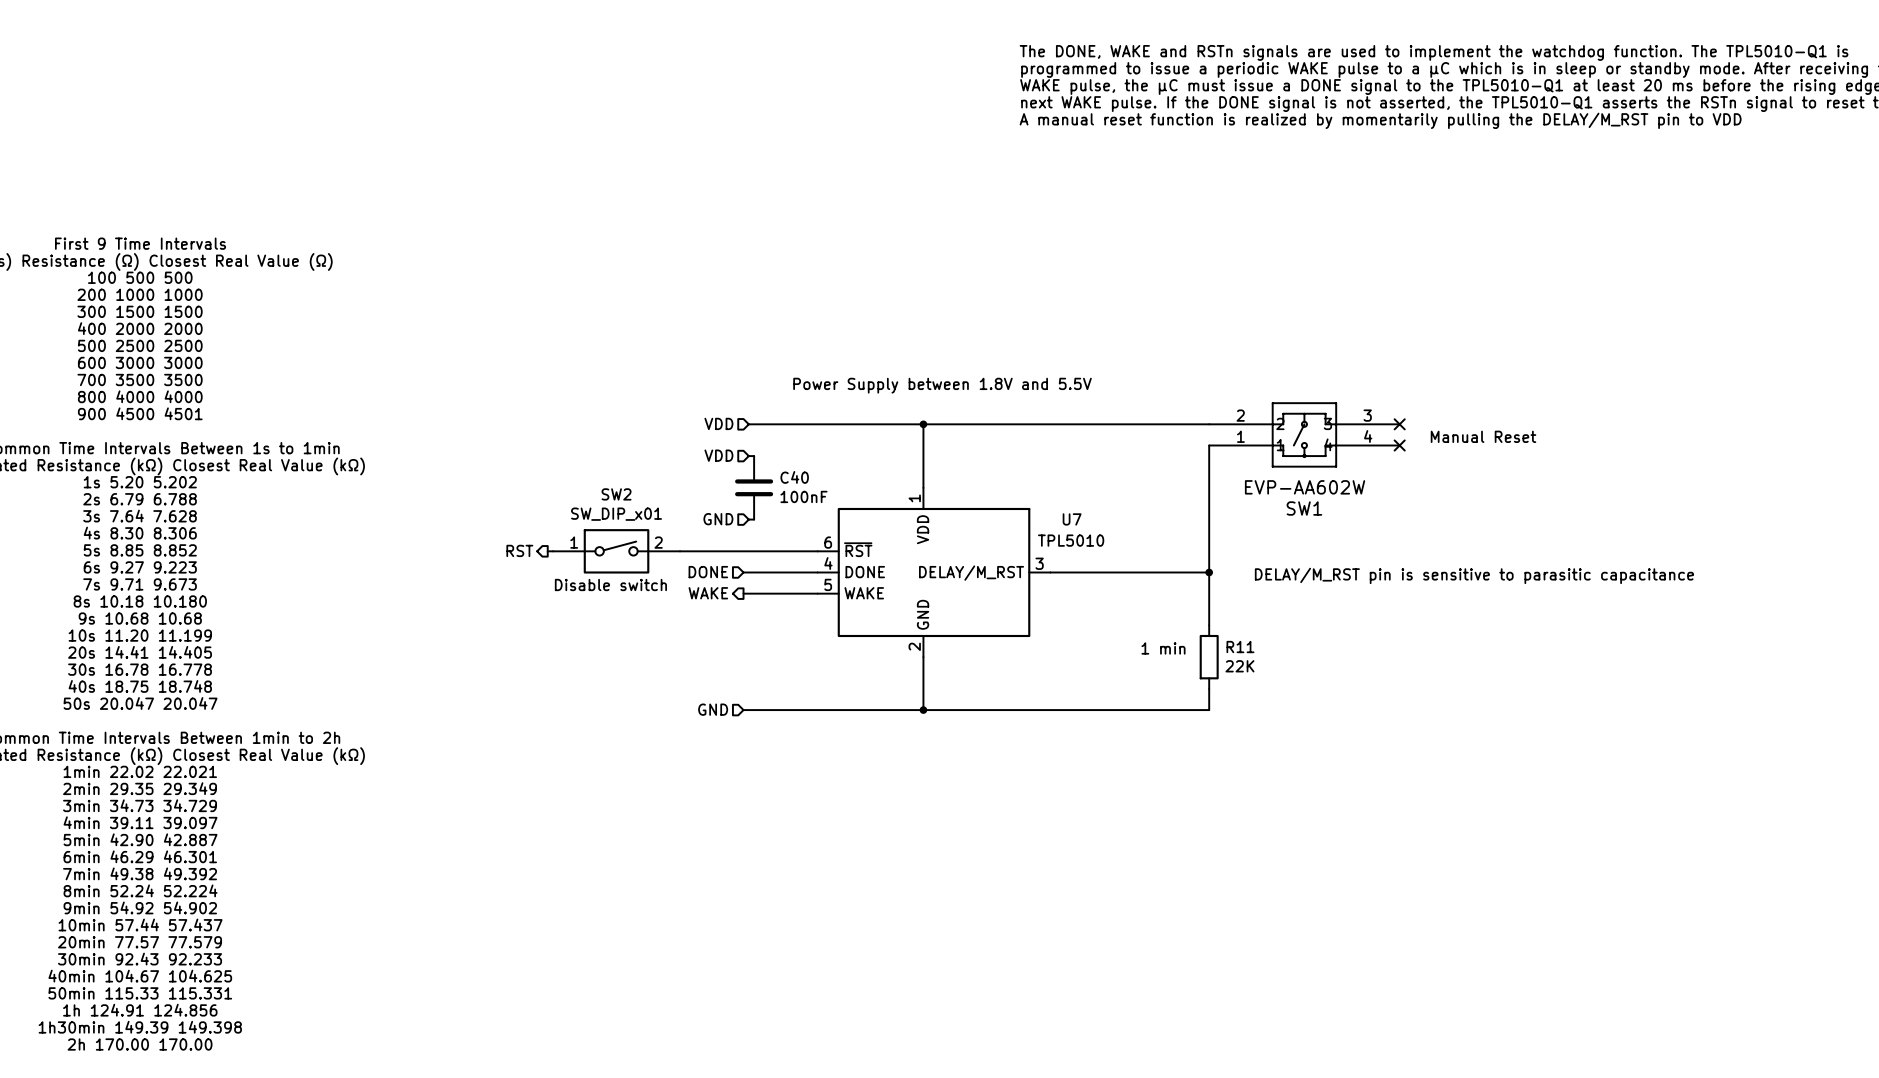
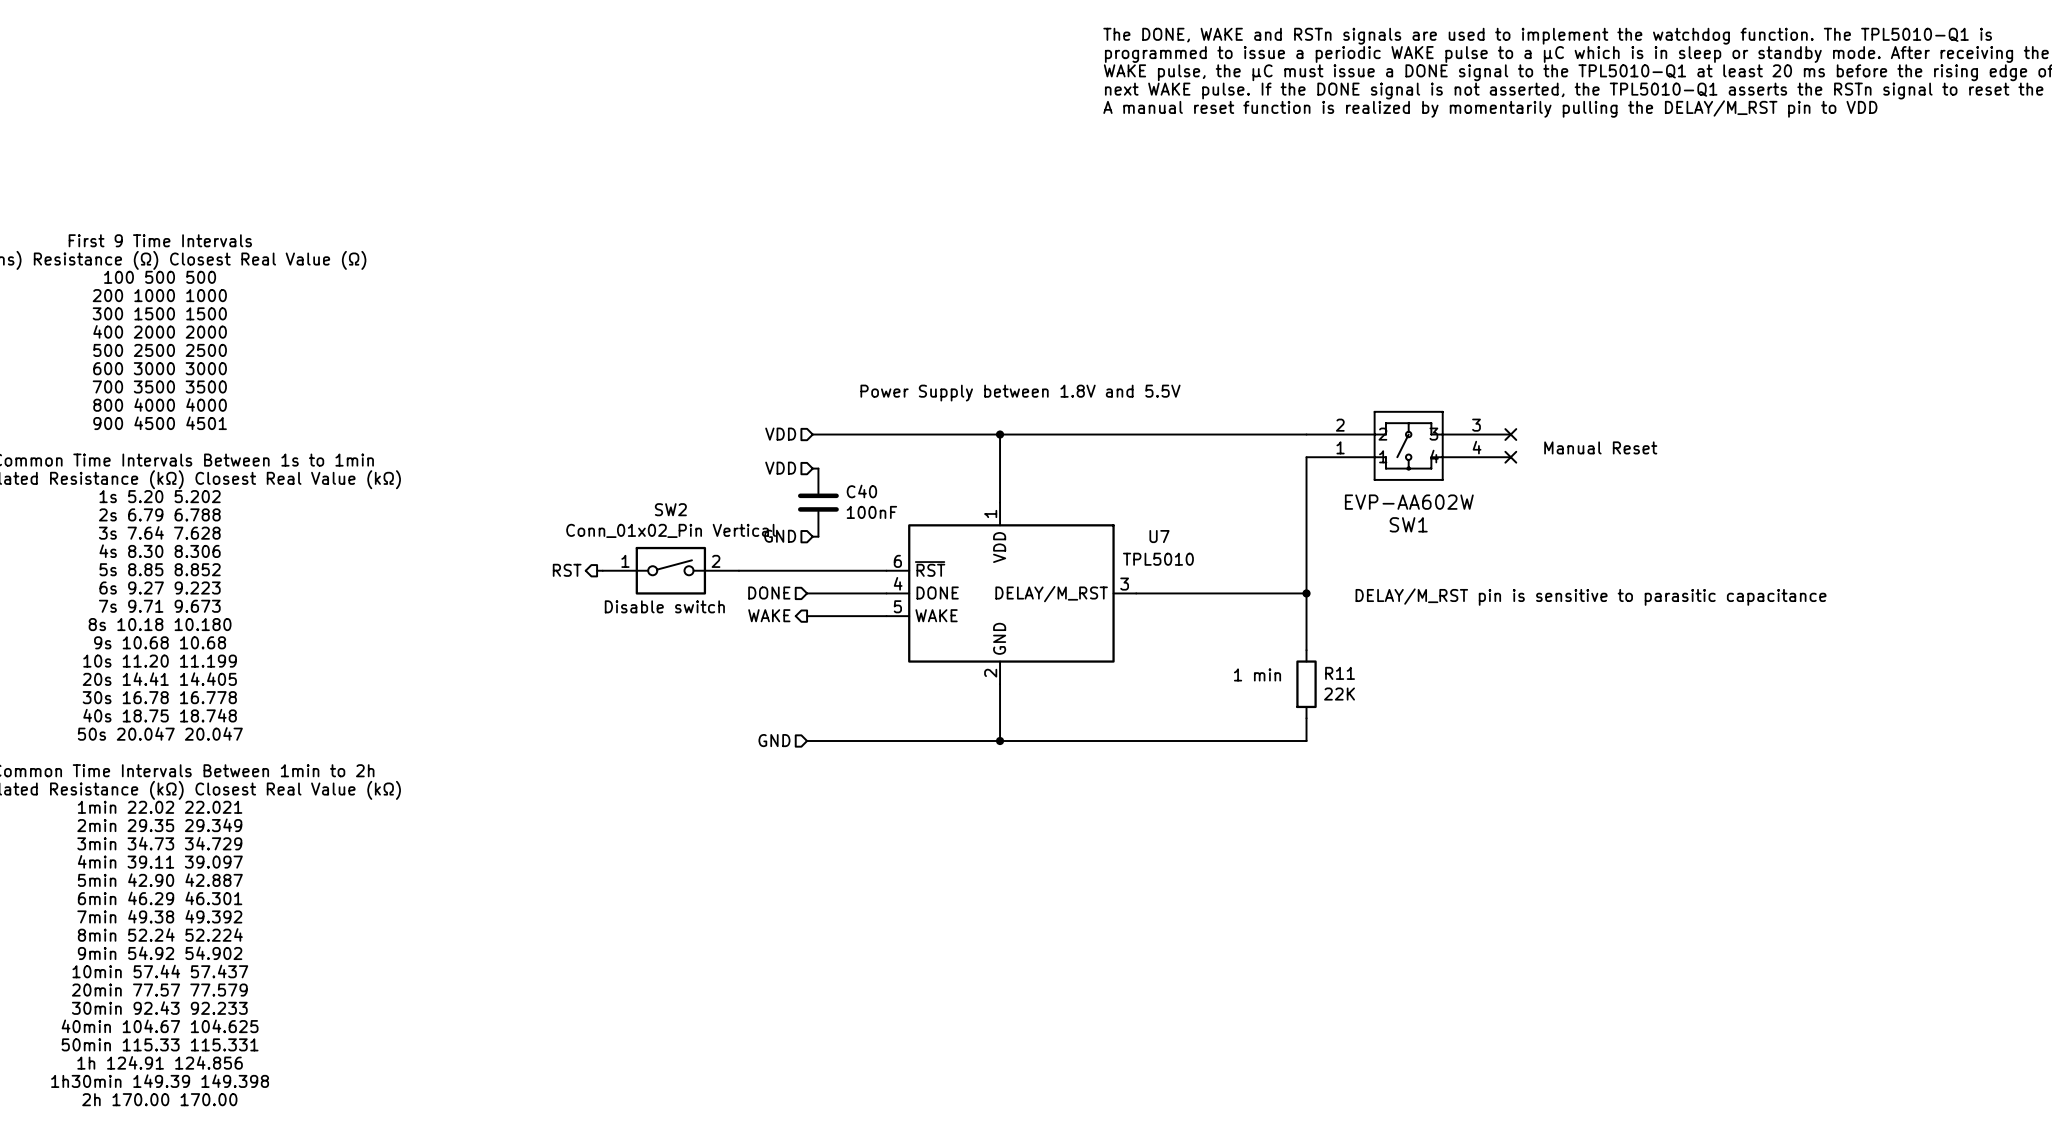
SW2 value: SW_DIP_x01 (616, 514) -> Conn_01x02_Pin Vertical (671, 530)

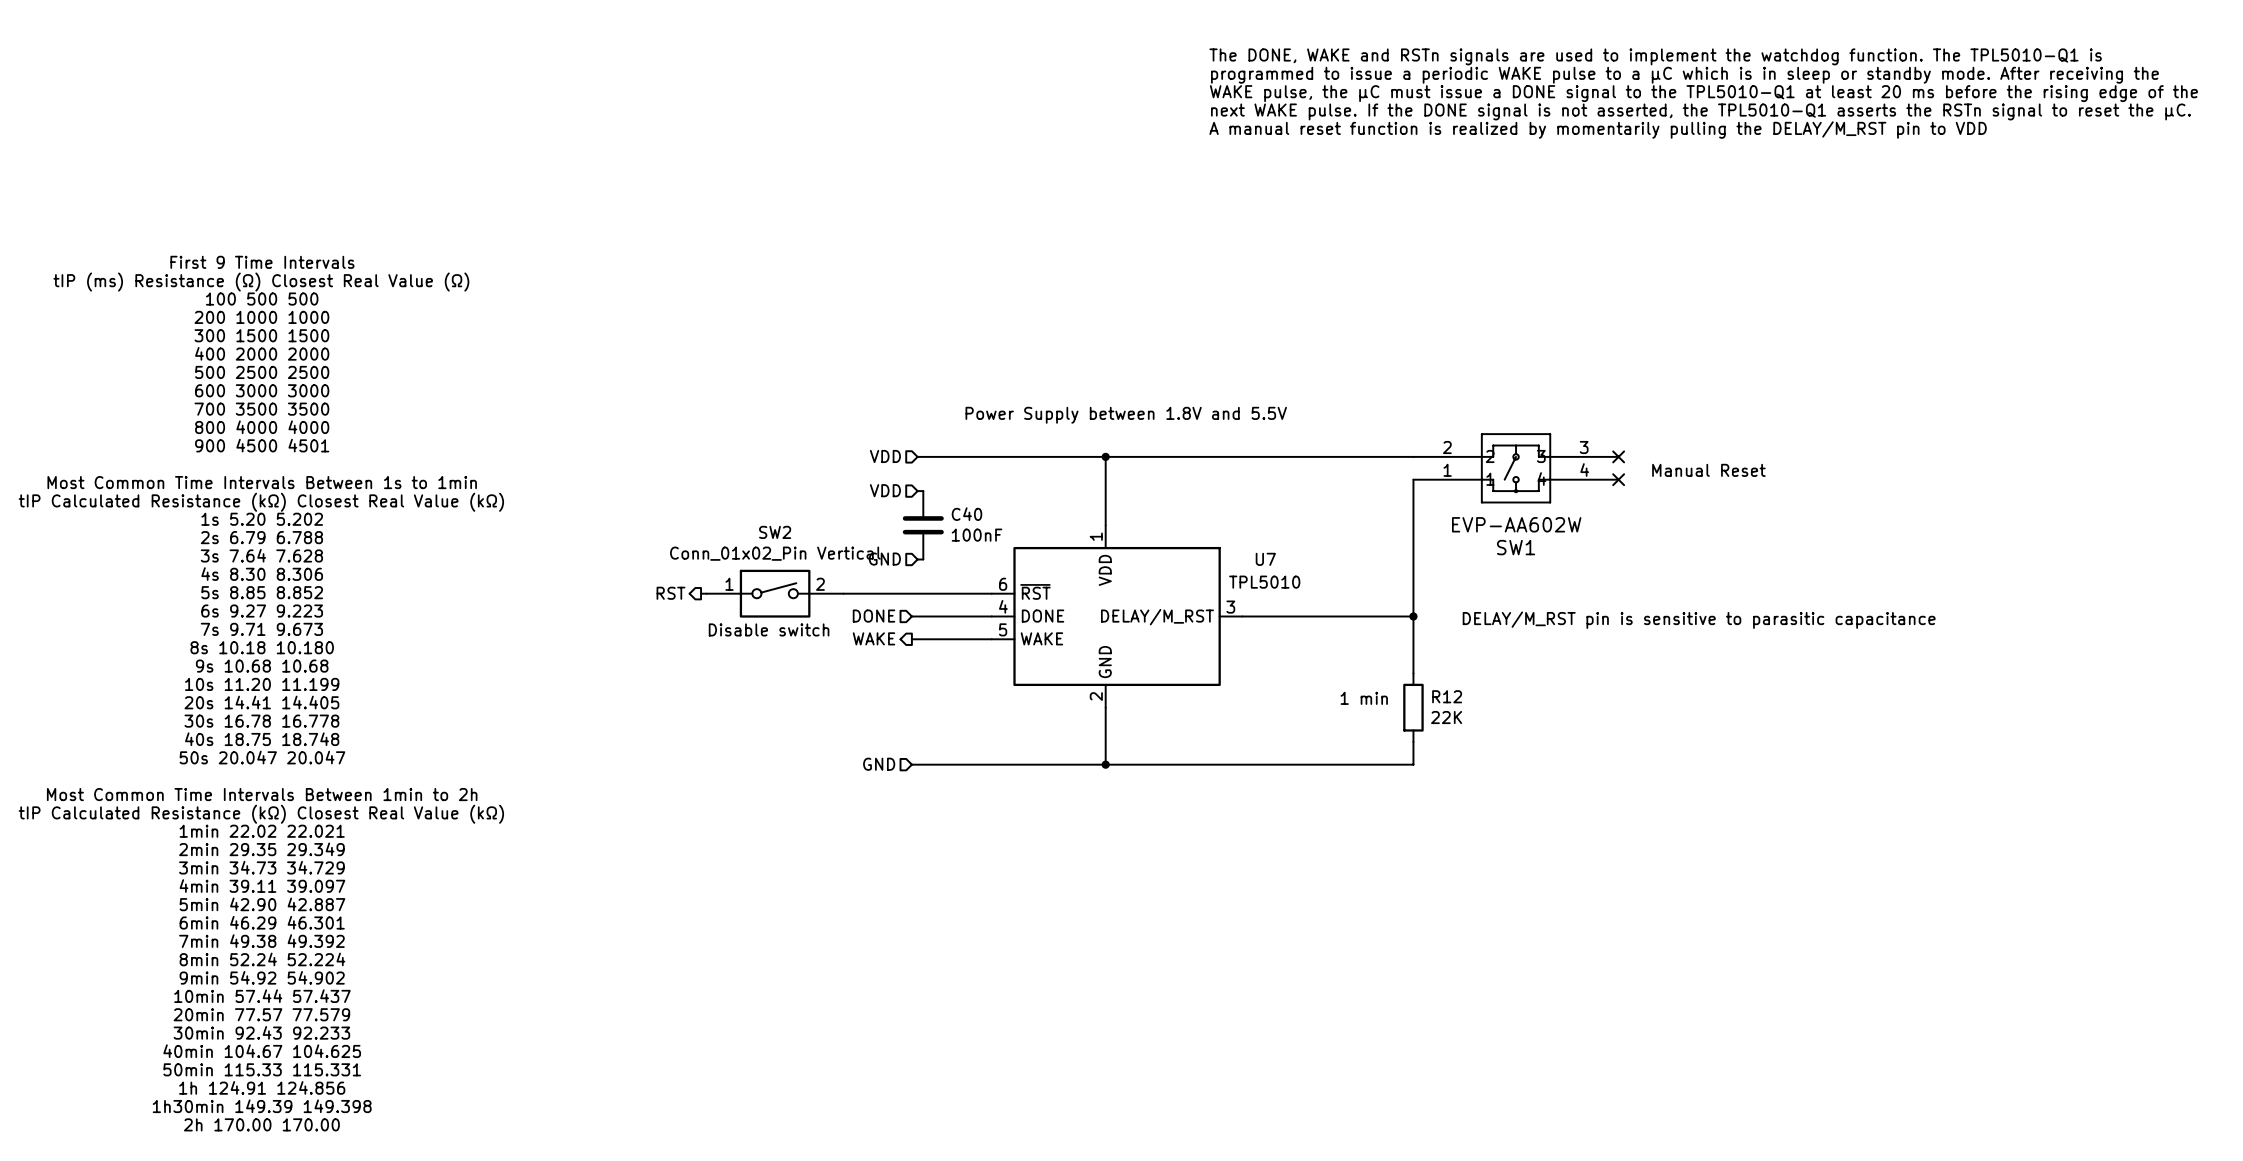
R11 name: R11 (1340, 673) -> R12 (1447, 696)

